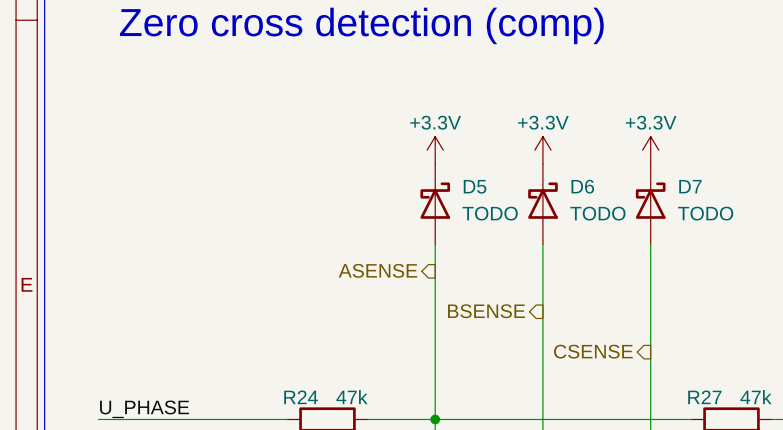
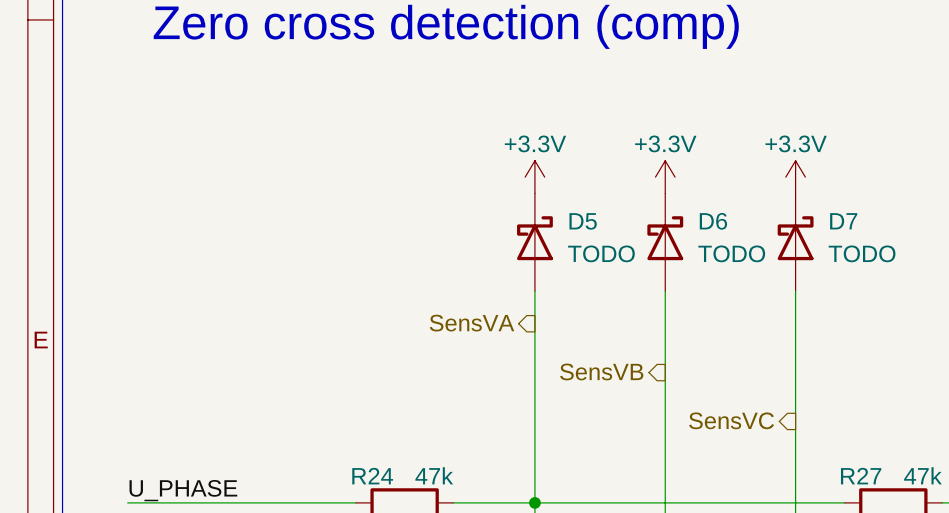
hierarchical label: ASENSE (378, 270) -> SensVA (472, 323)
hierarchical label: BSENSE (486, 311) -> SensVB (601, 371)
hierarchical label: CSENSE (593, 351) -> SensVC (731, 420)

